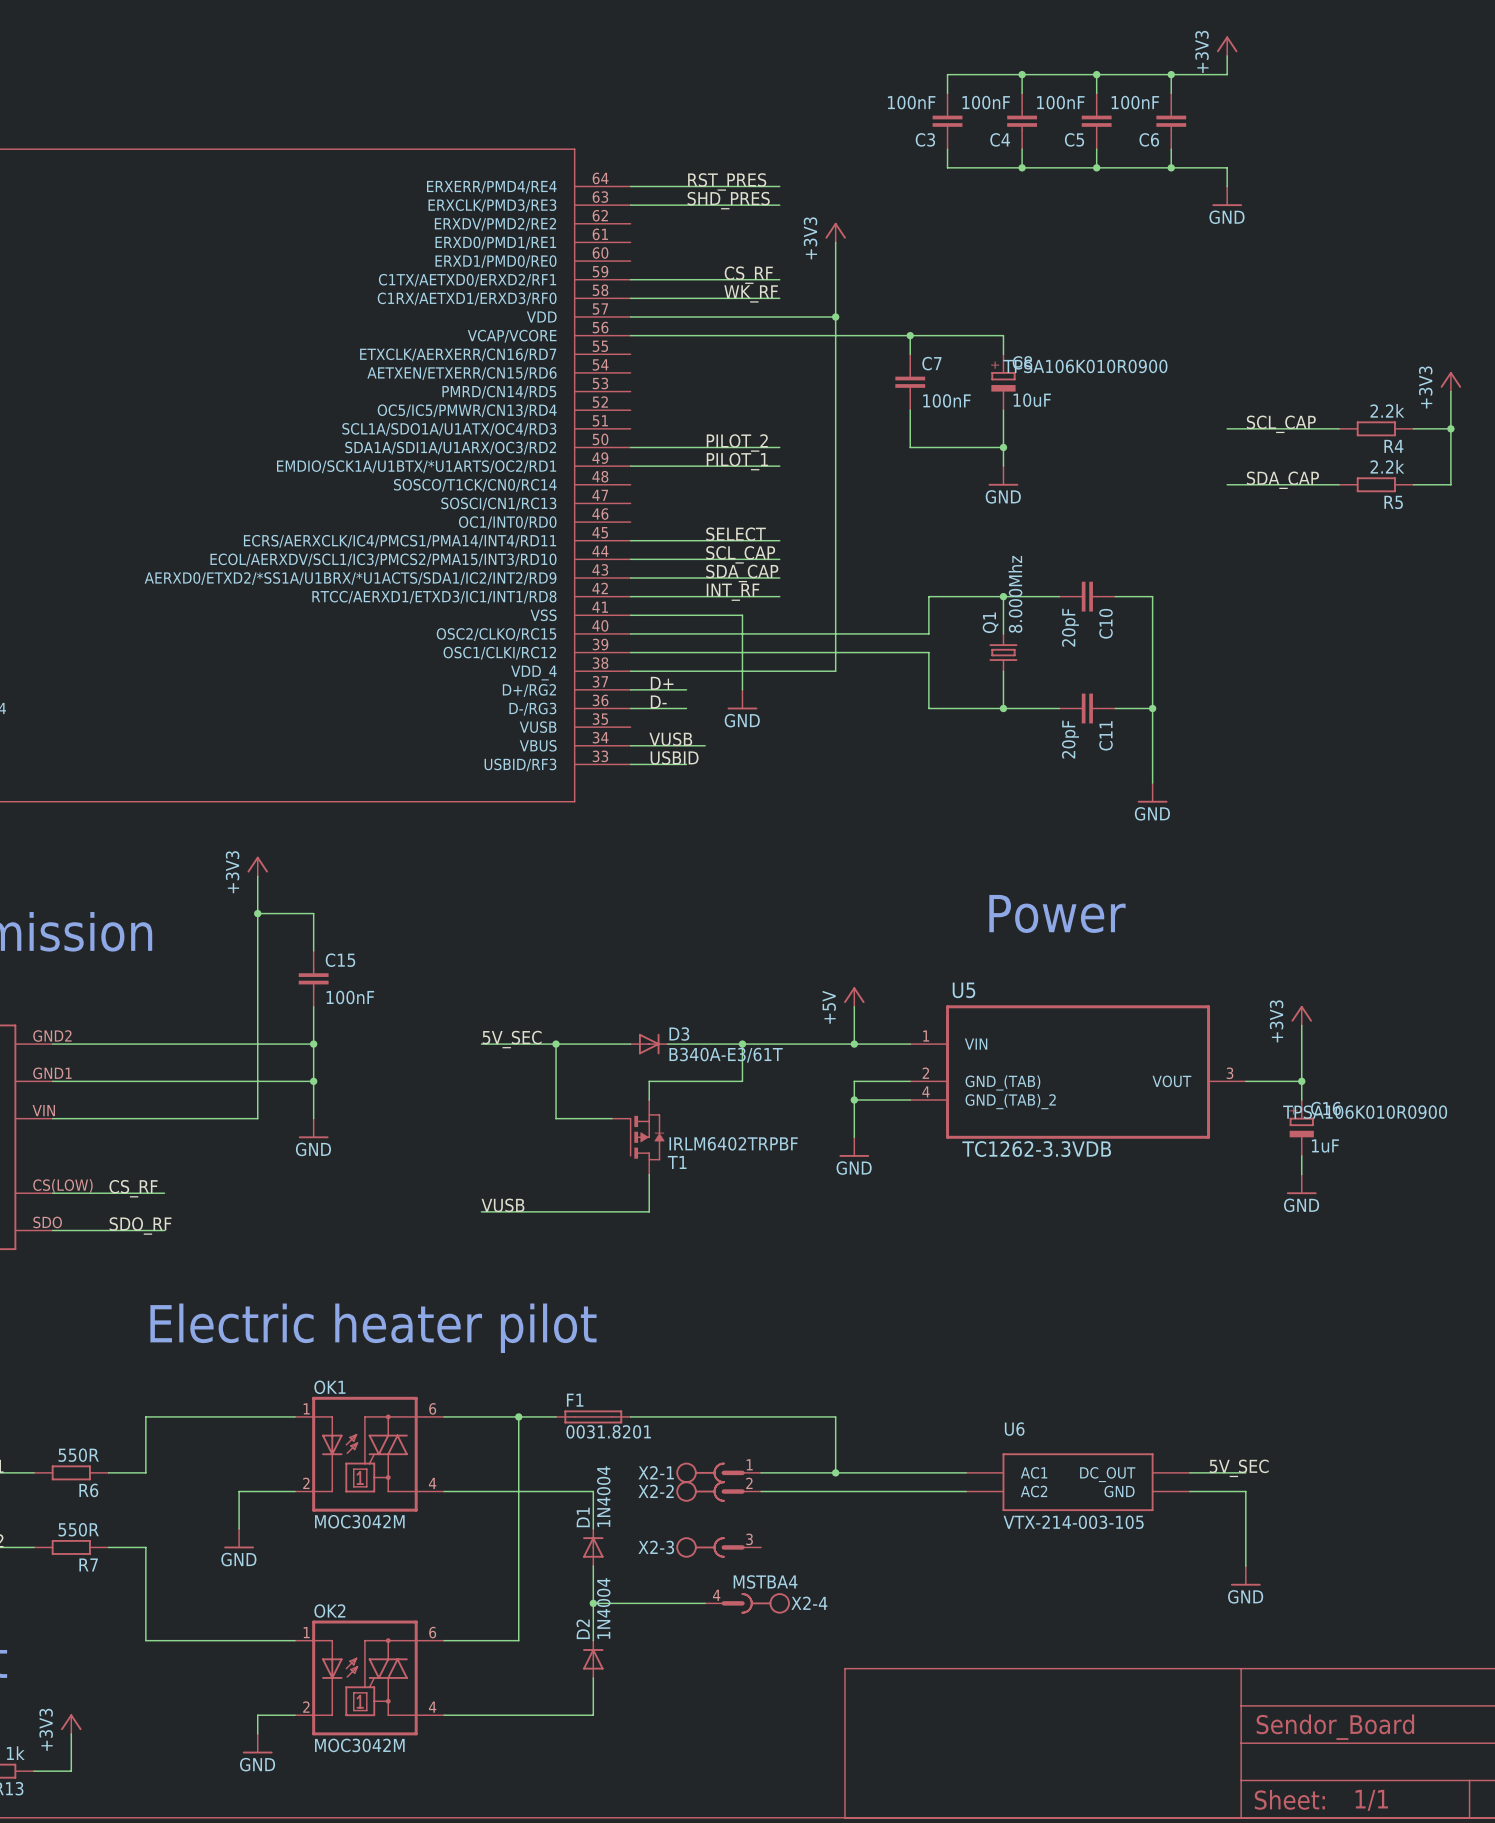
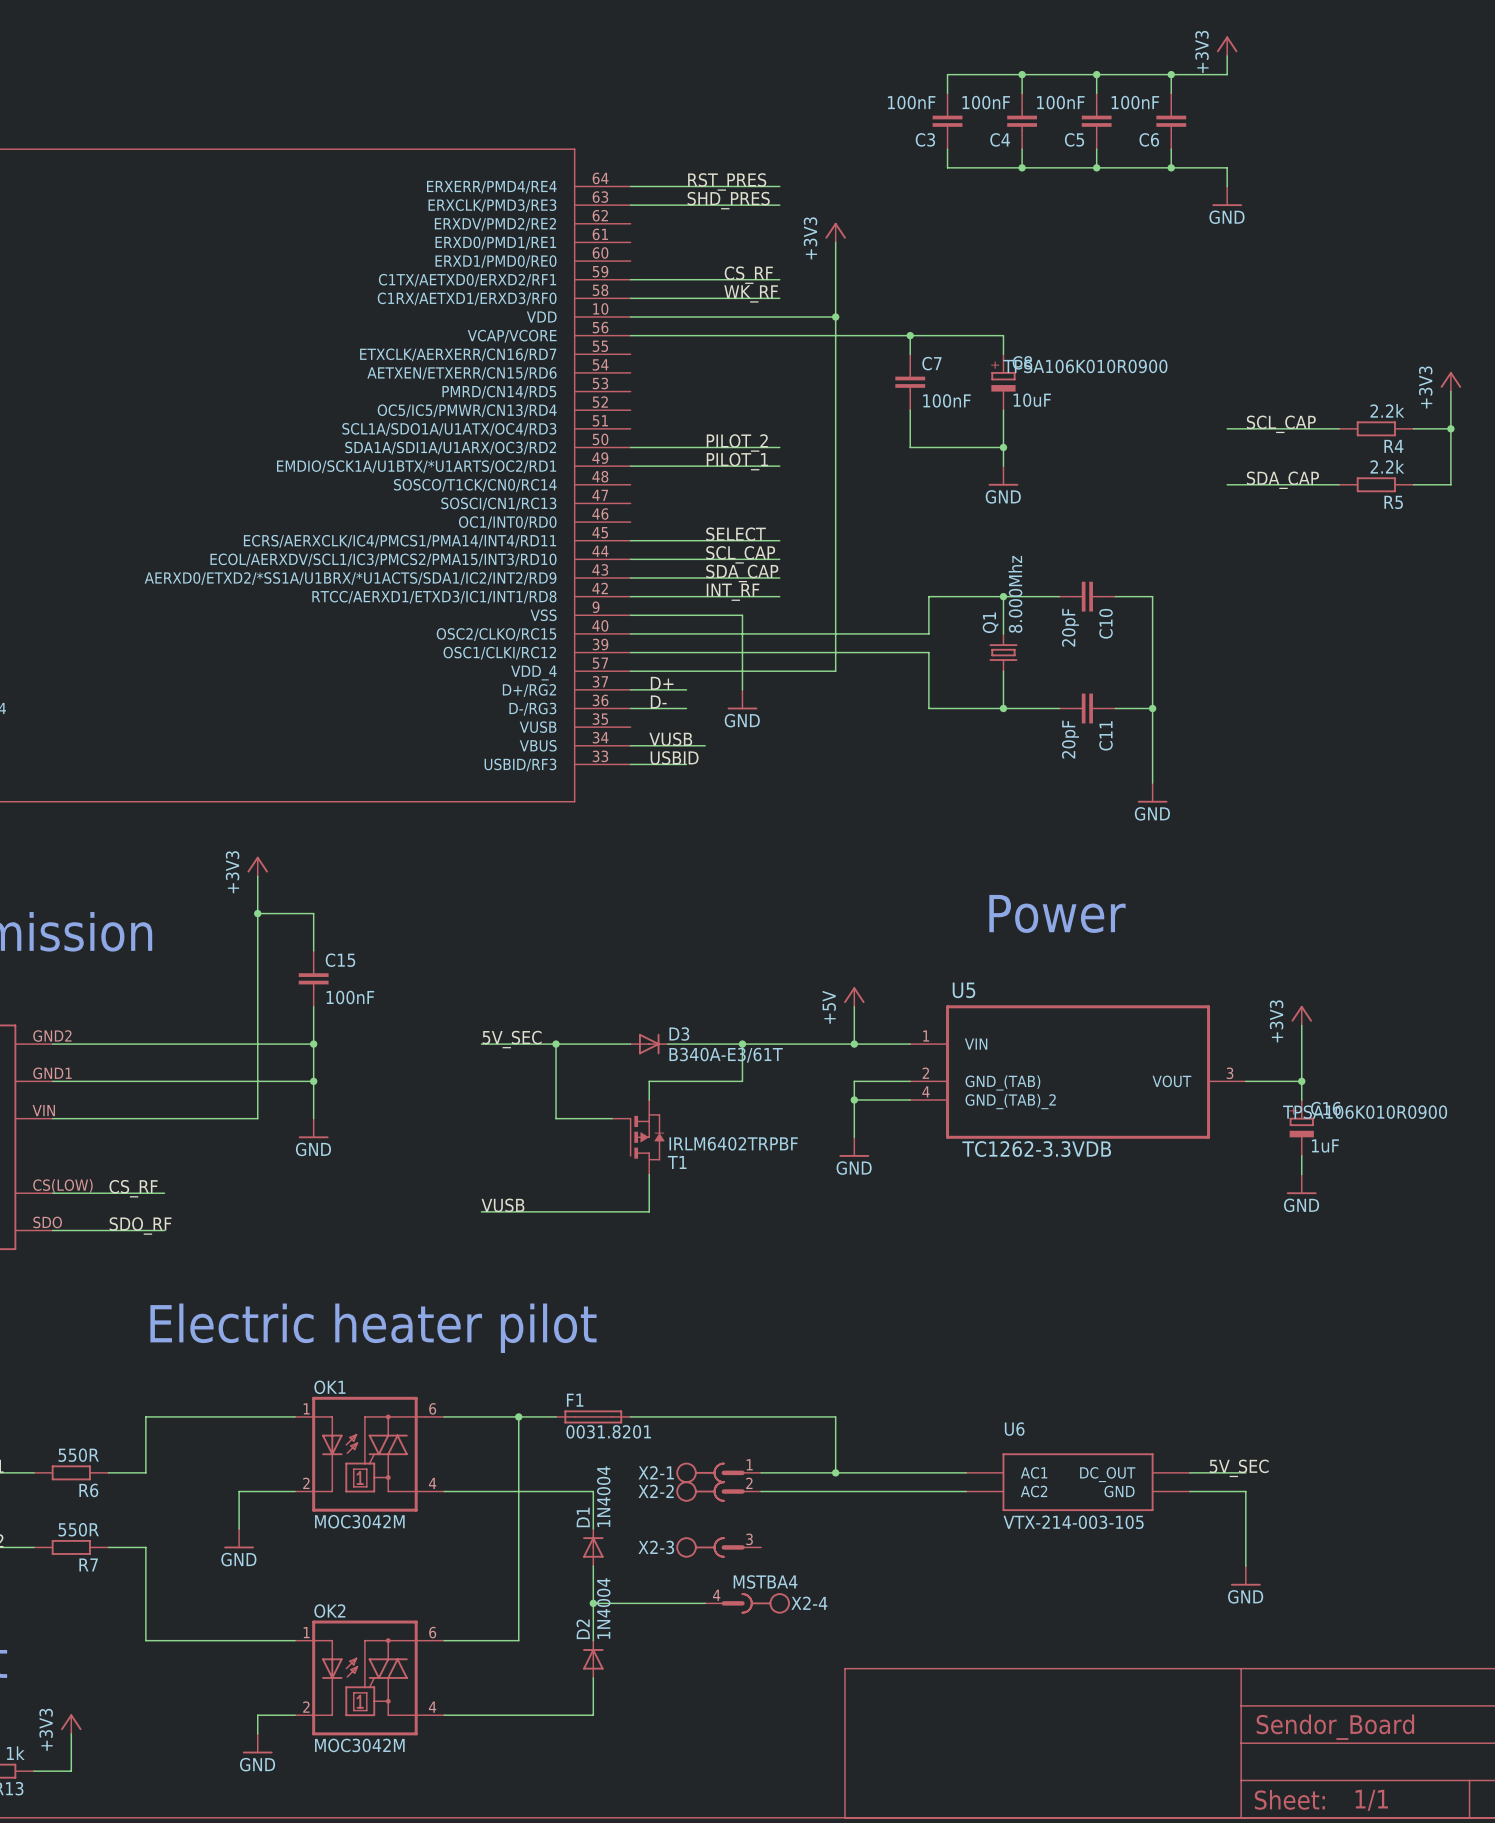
part pin number: 57 (600, 309) -> 10 (600, 308)
part pin number: 41 (600, 607) -> 9 (596, 607)
part pin number: 38 (600, 663) -> 57 (600, 663)

